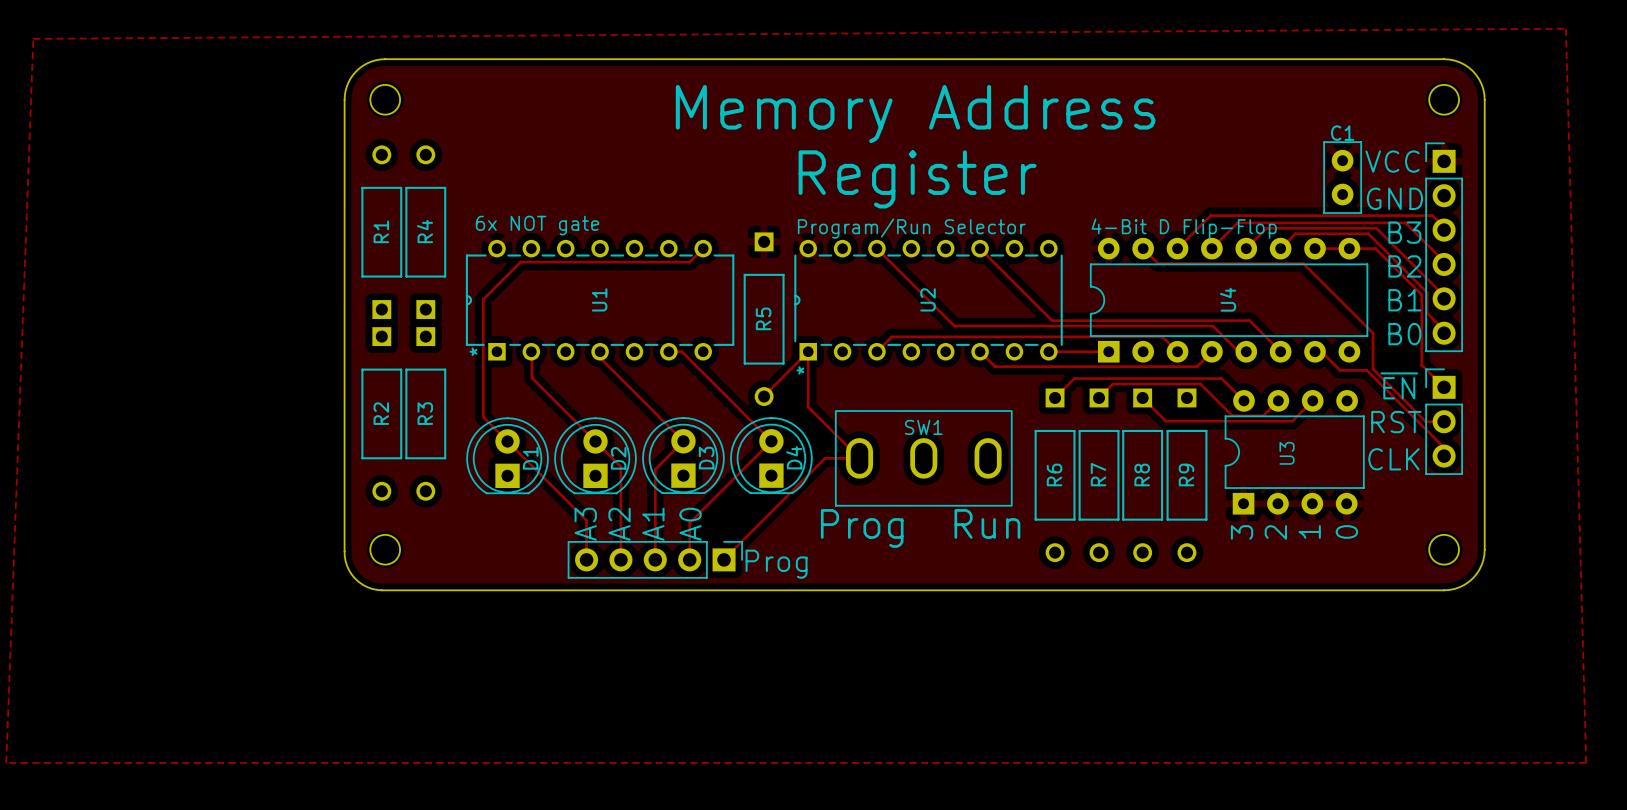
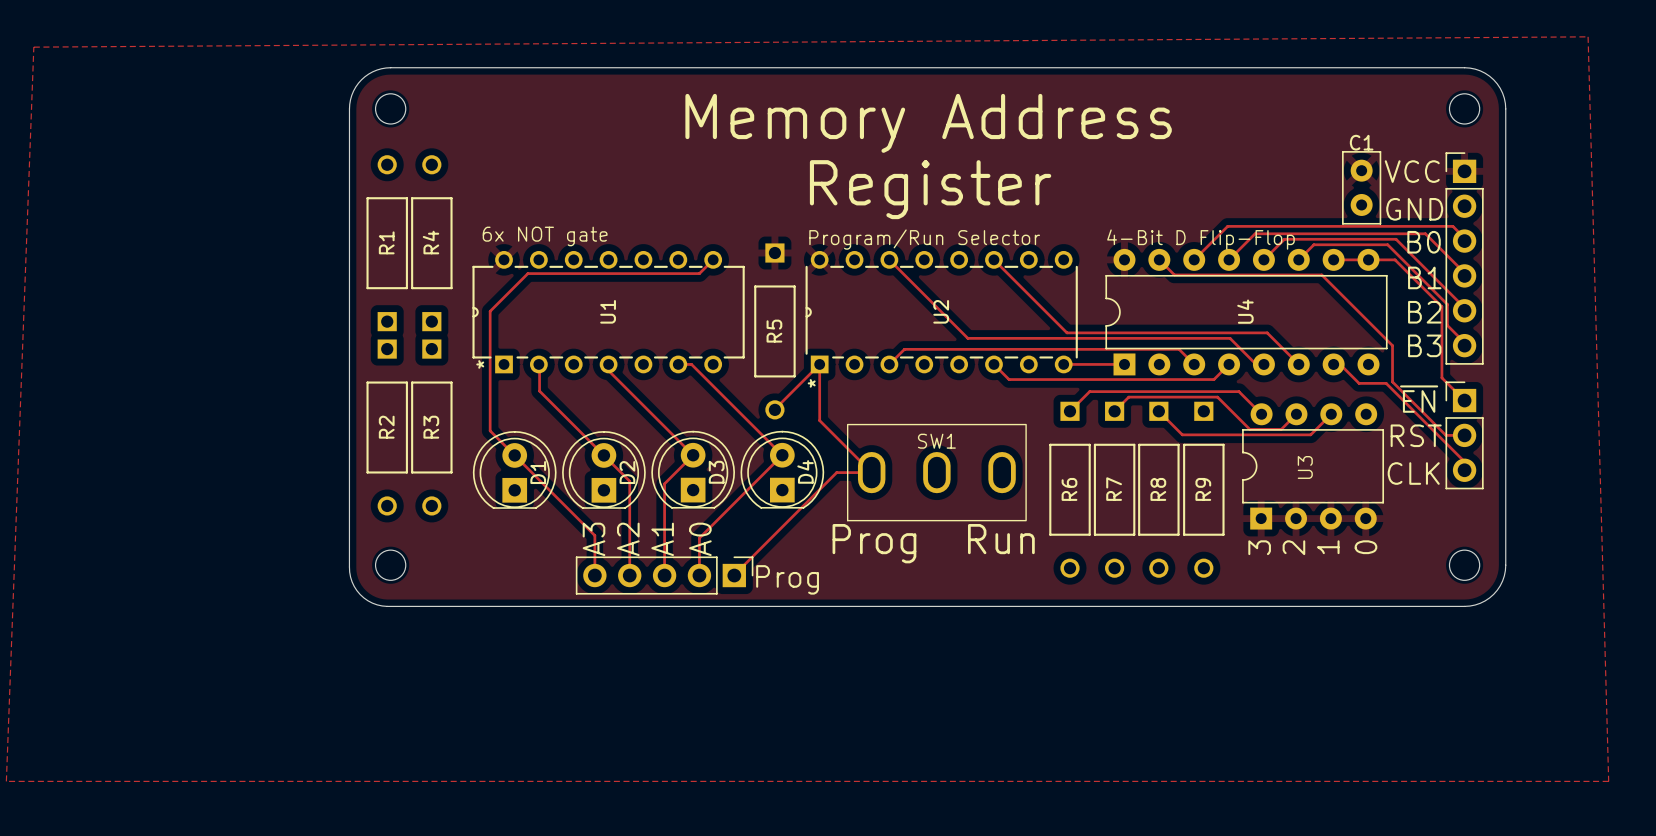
text: B3 (1404, 232) -> B0 (1424, 242)
text: B2 (1404, 266) -> B1 (1424, 277)
text: B1 (1404, 300) -> B2 (1424, 312)
text: B0 (1404, 334) -> B3 (1424, 345)

